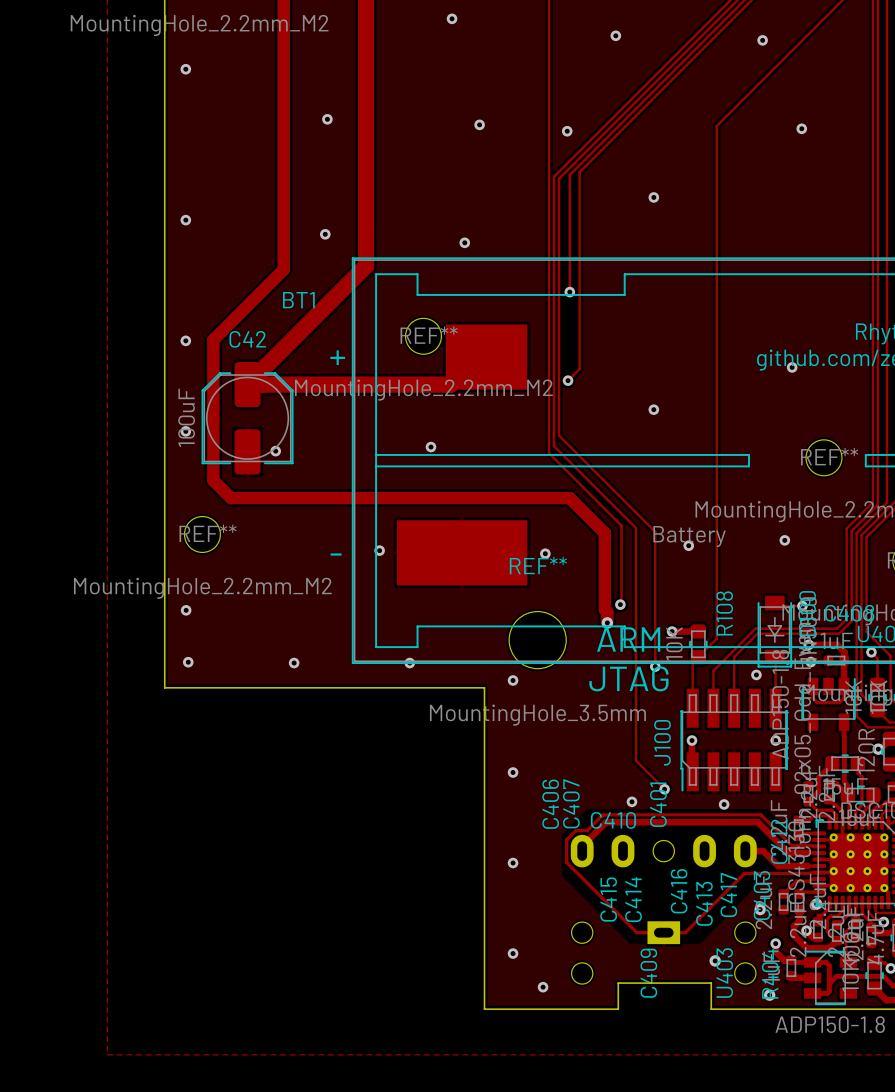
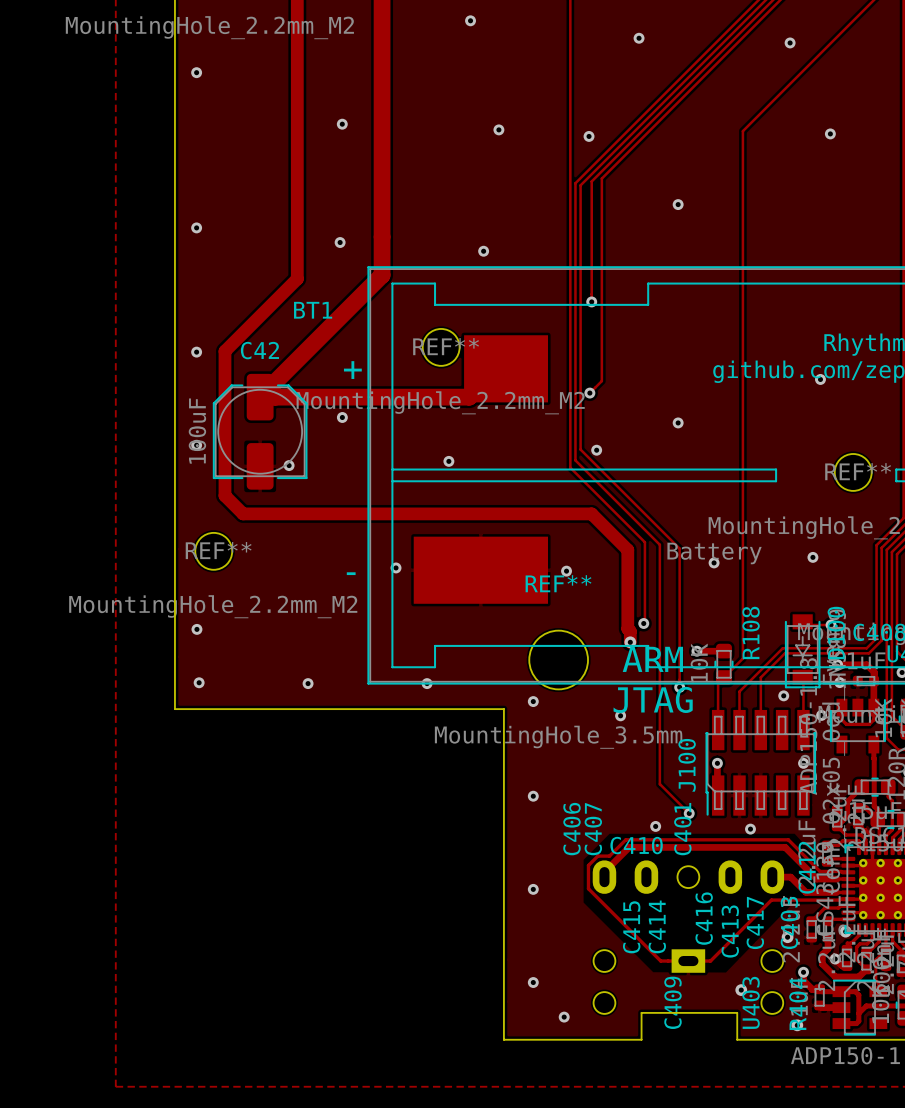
via: none -> (342, 417)
via: none -> (596, 450)
via: none -> (821, 715)
via: none -> (620, 715)

